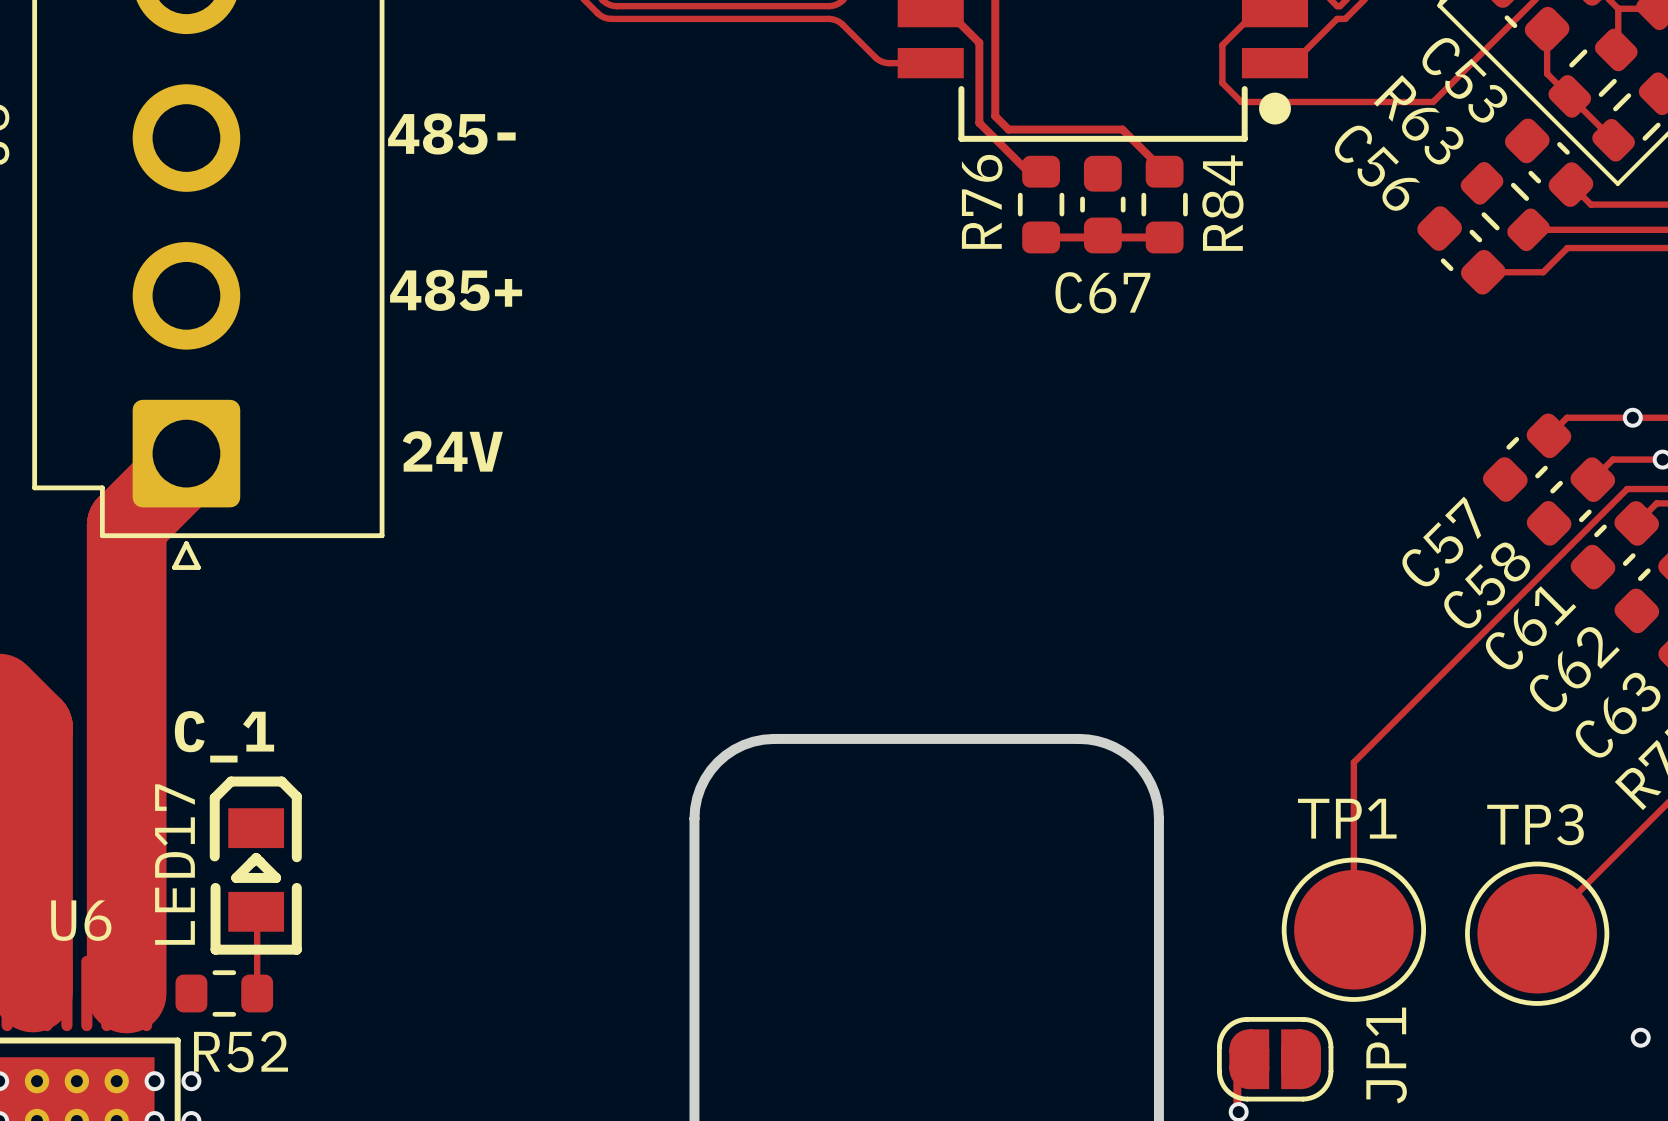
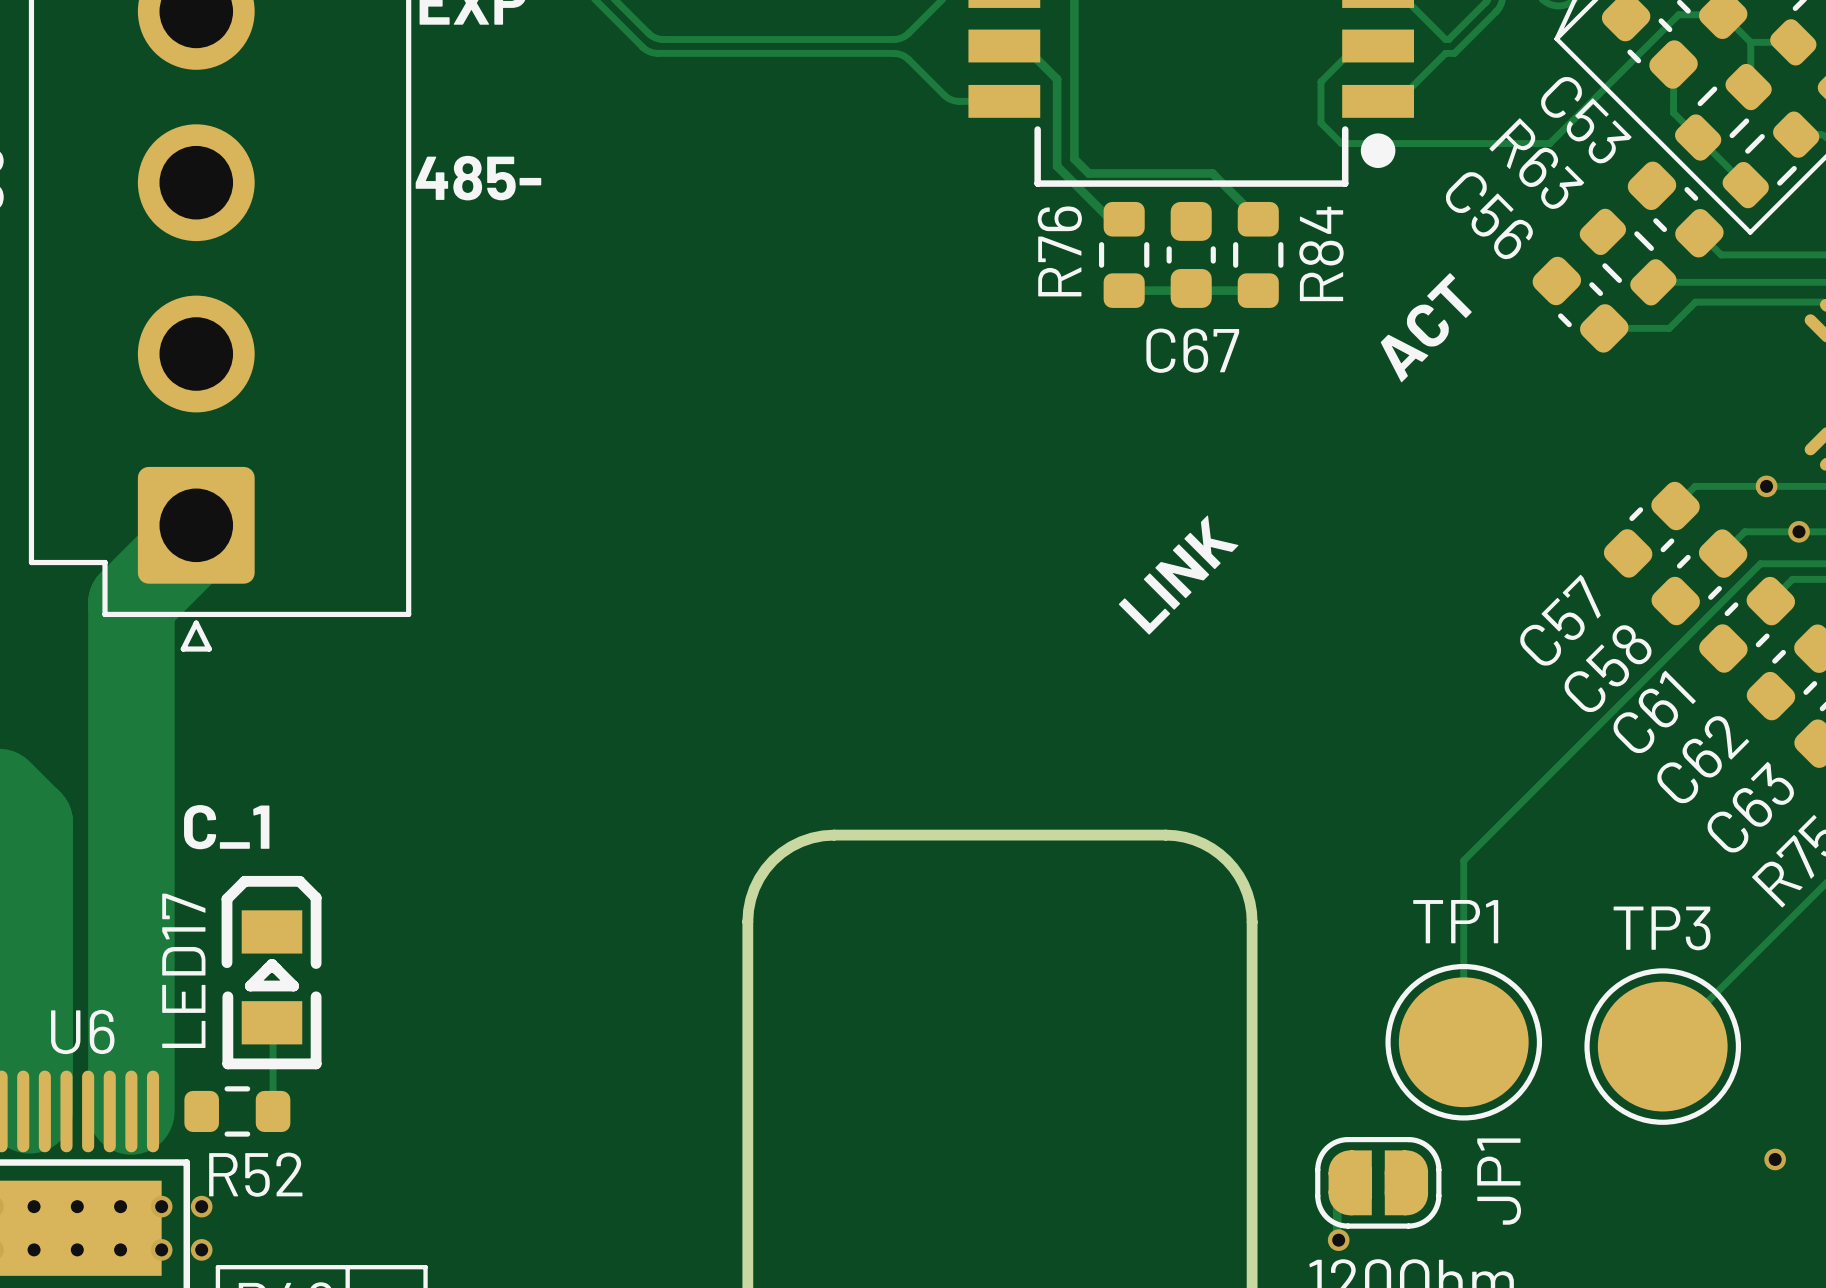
text: none -> ACT (1426, 327)
text: 485+ (456, 290) -> none
text: 24V (452, 451) -> none
text: none -> LINK (1178, 575)

